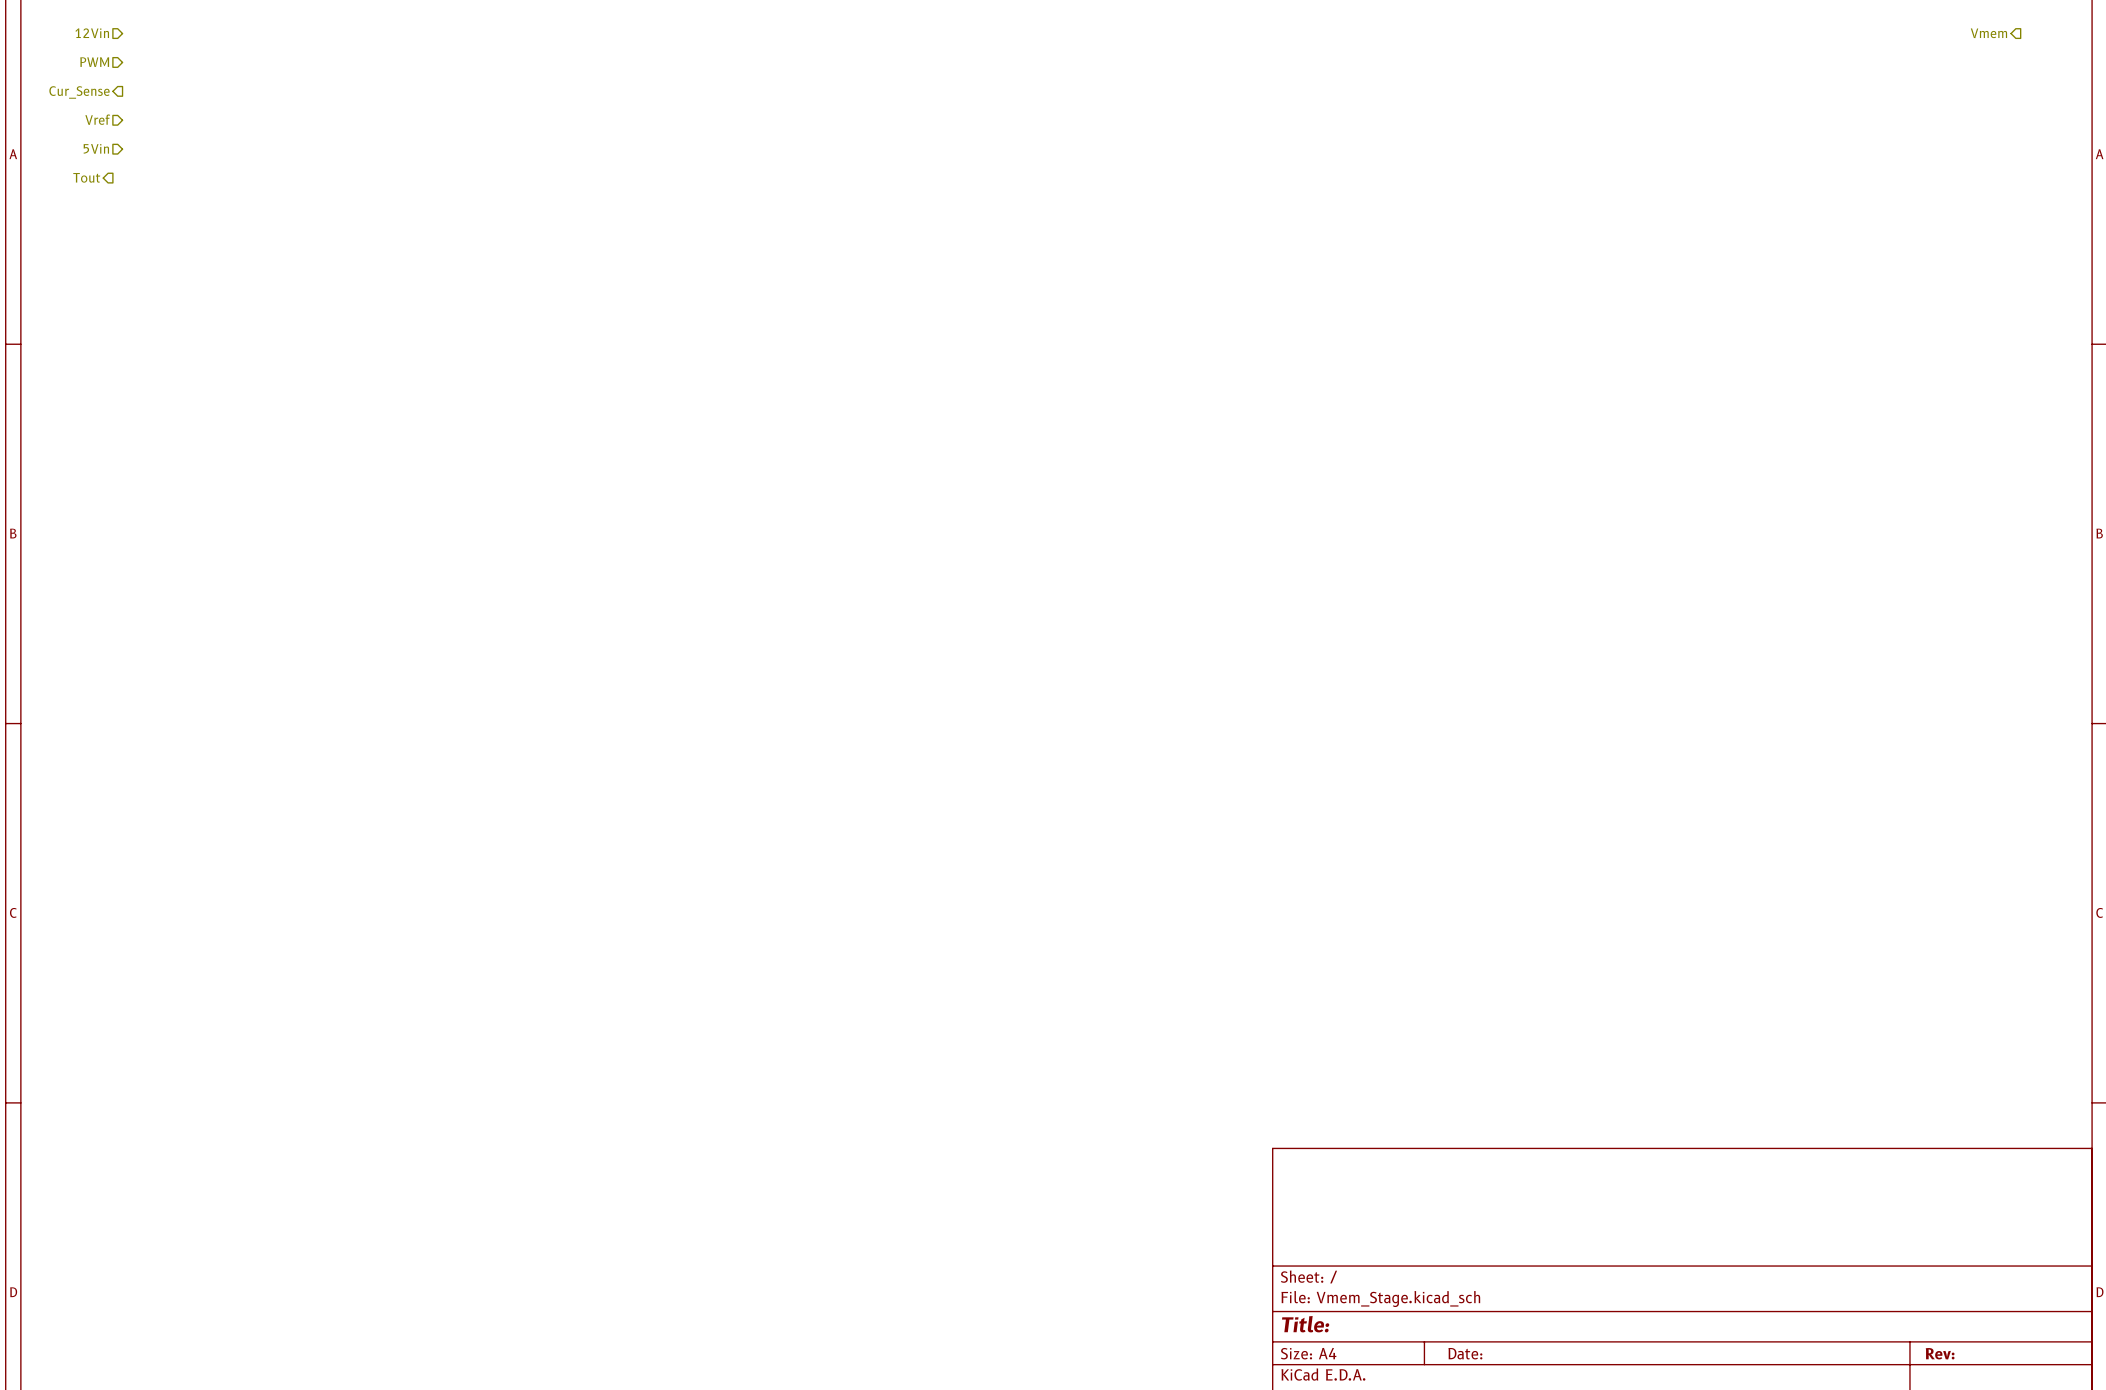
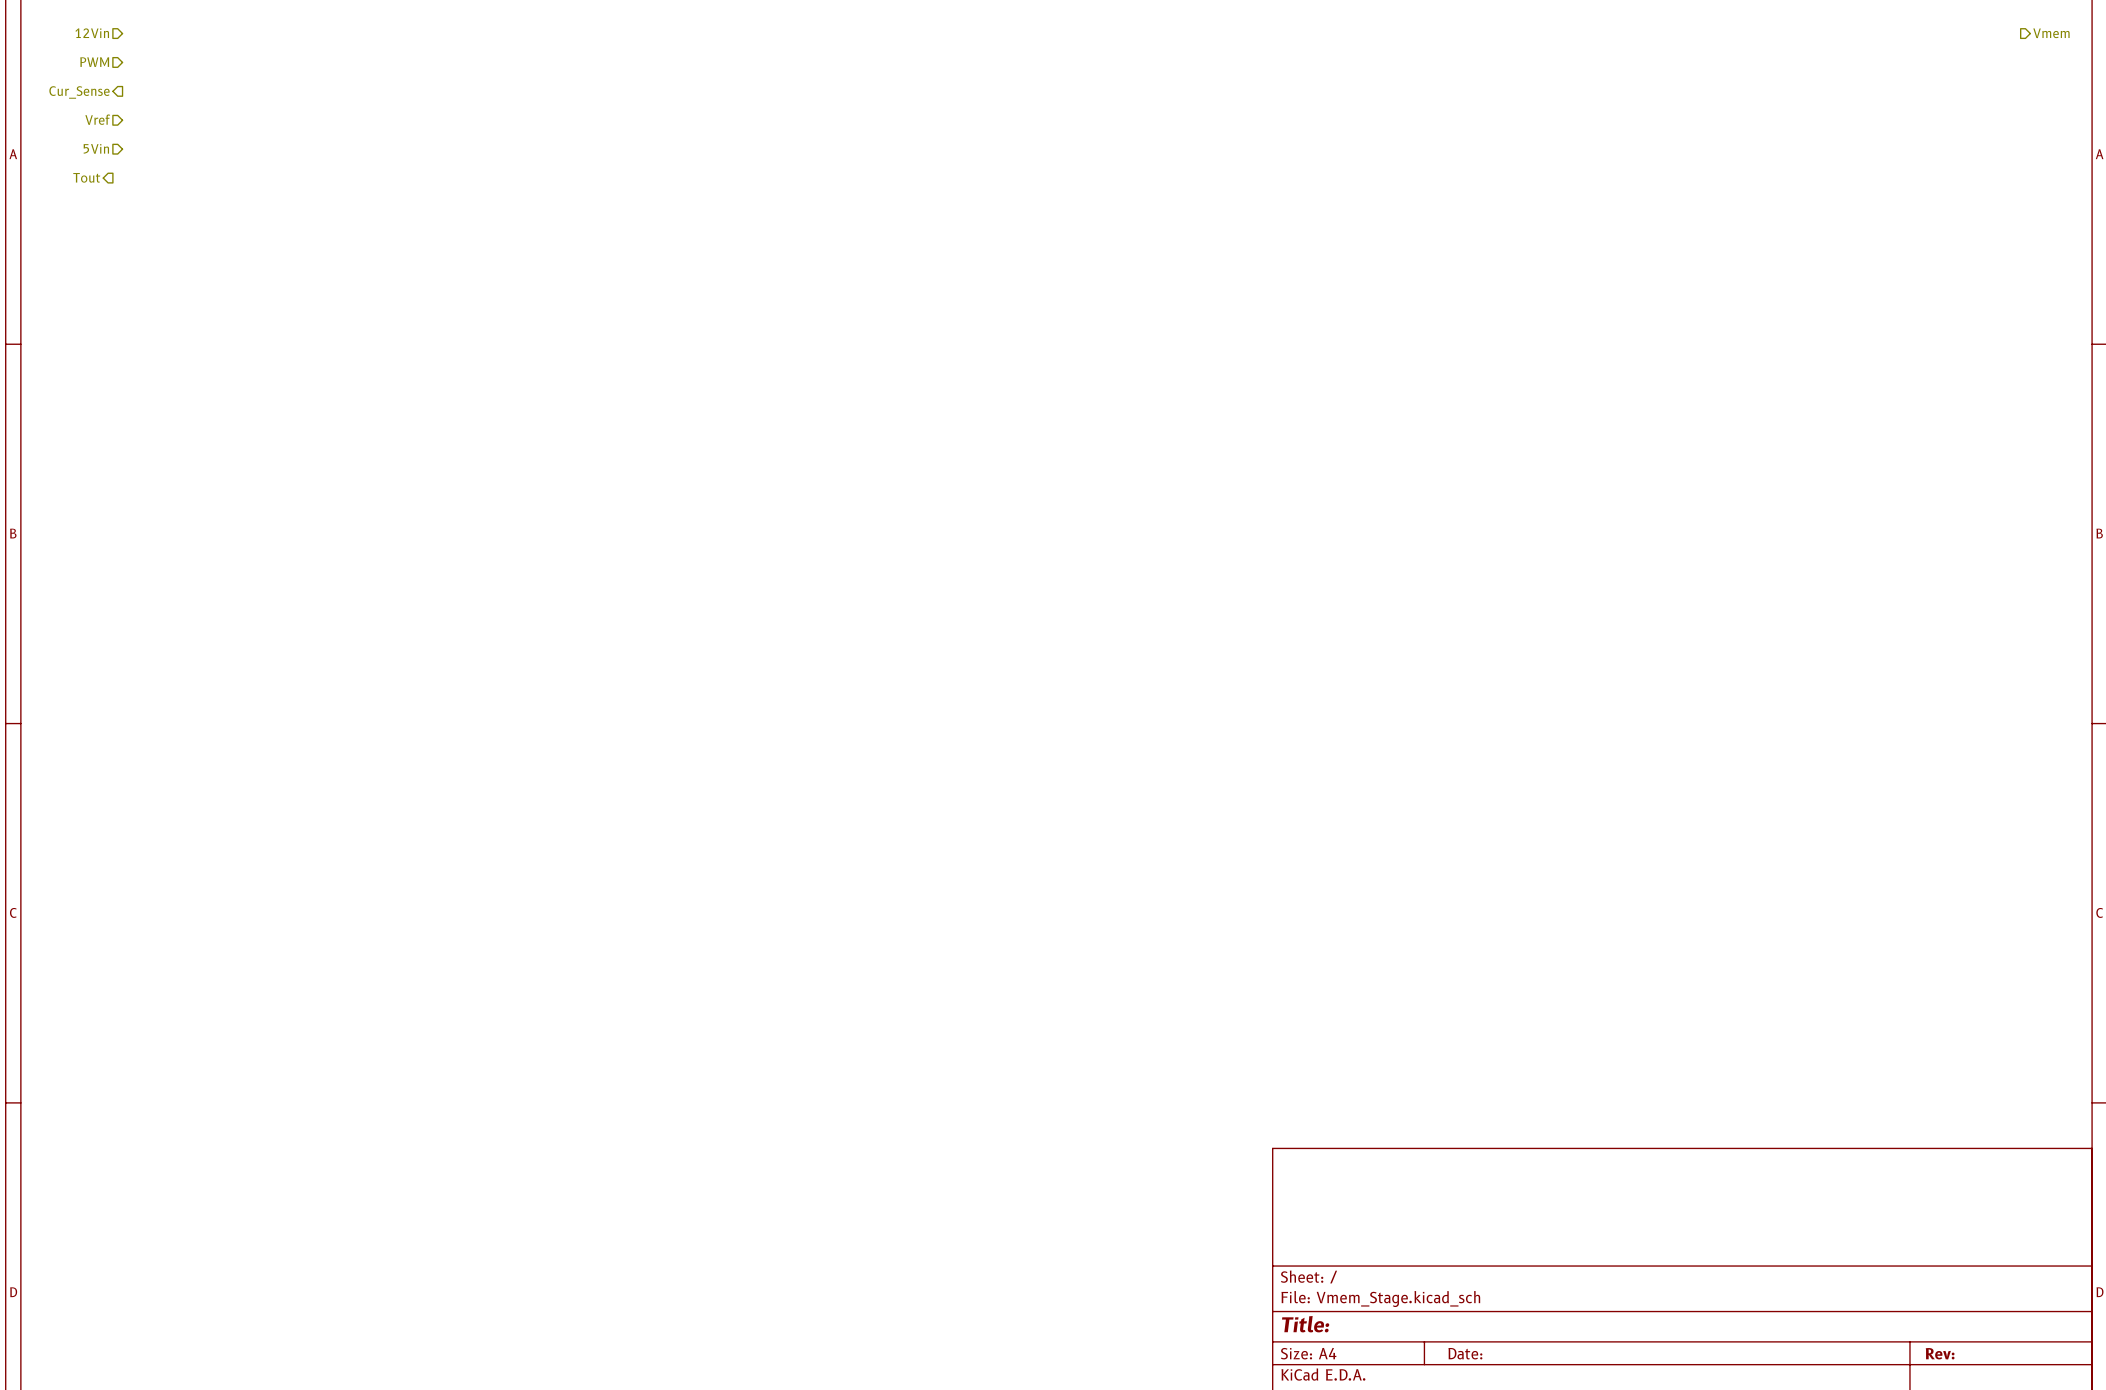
hierarchical label rotation: 0° (1988, 33) -> 180° (2051, 33)
hierarchical label position: Vmem (1988, 33) -> Vmem (2051, 33)

